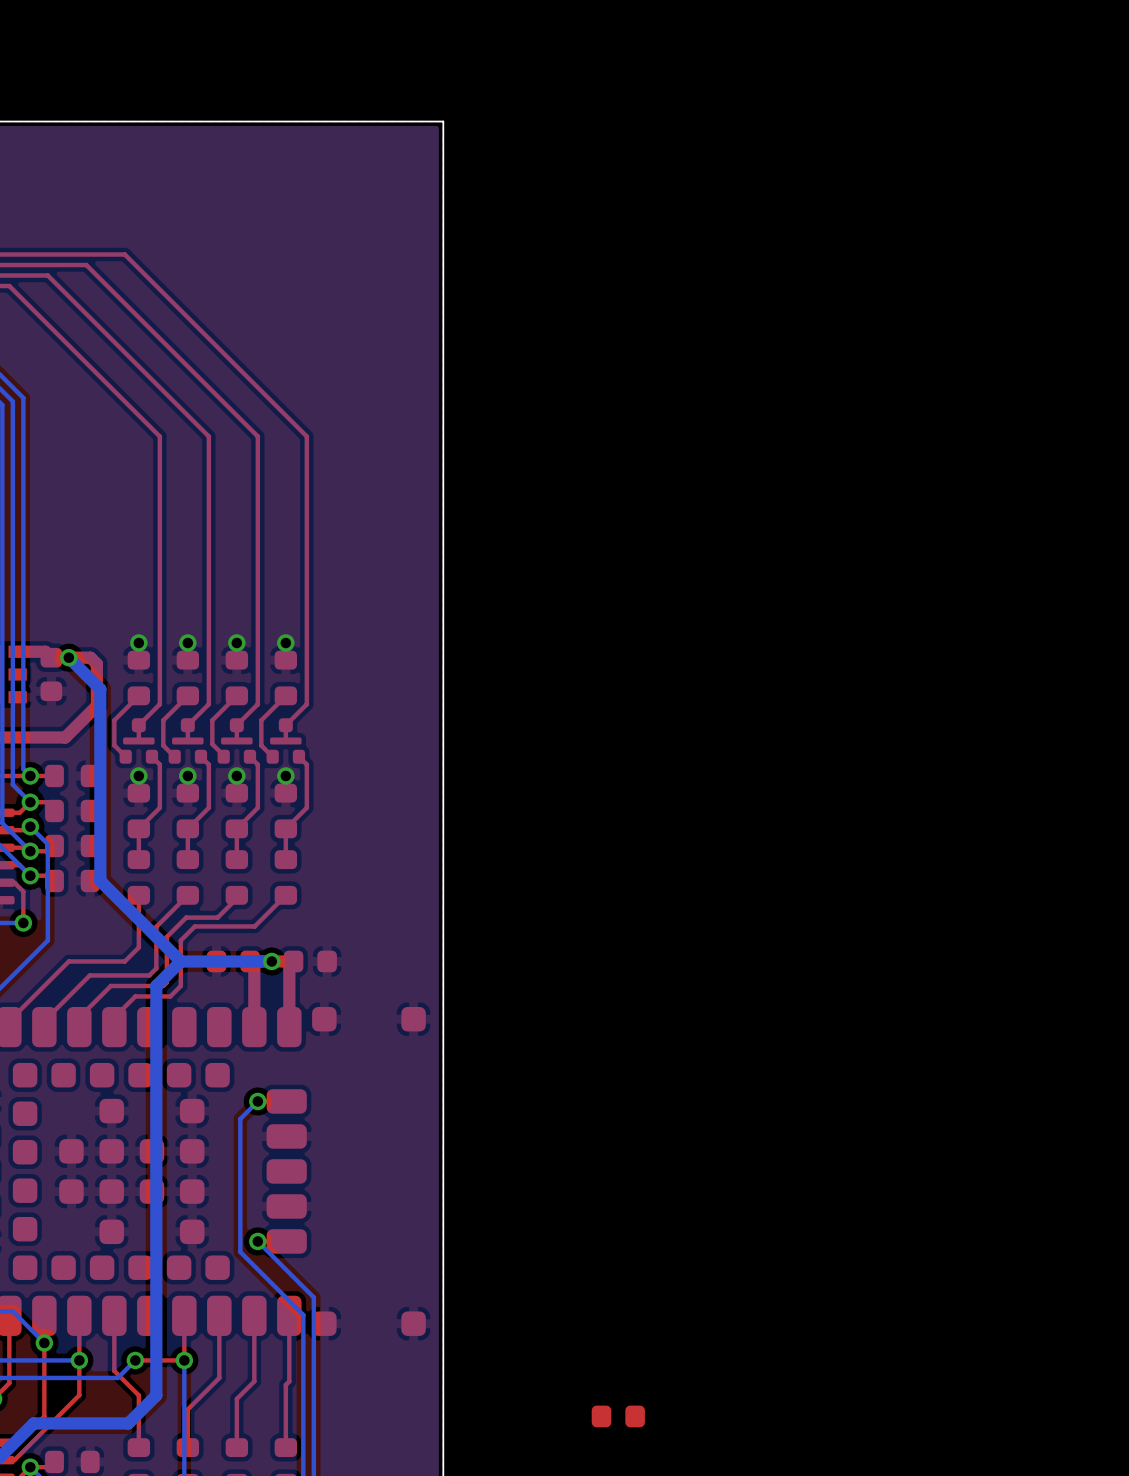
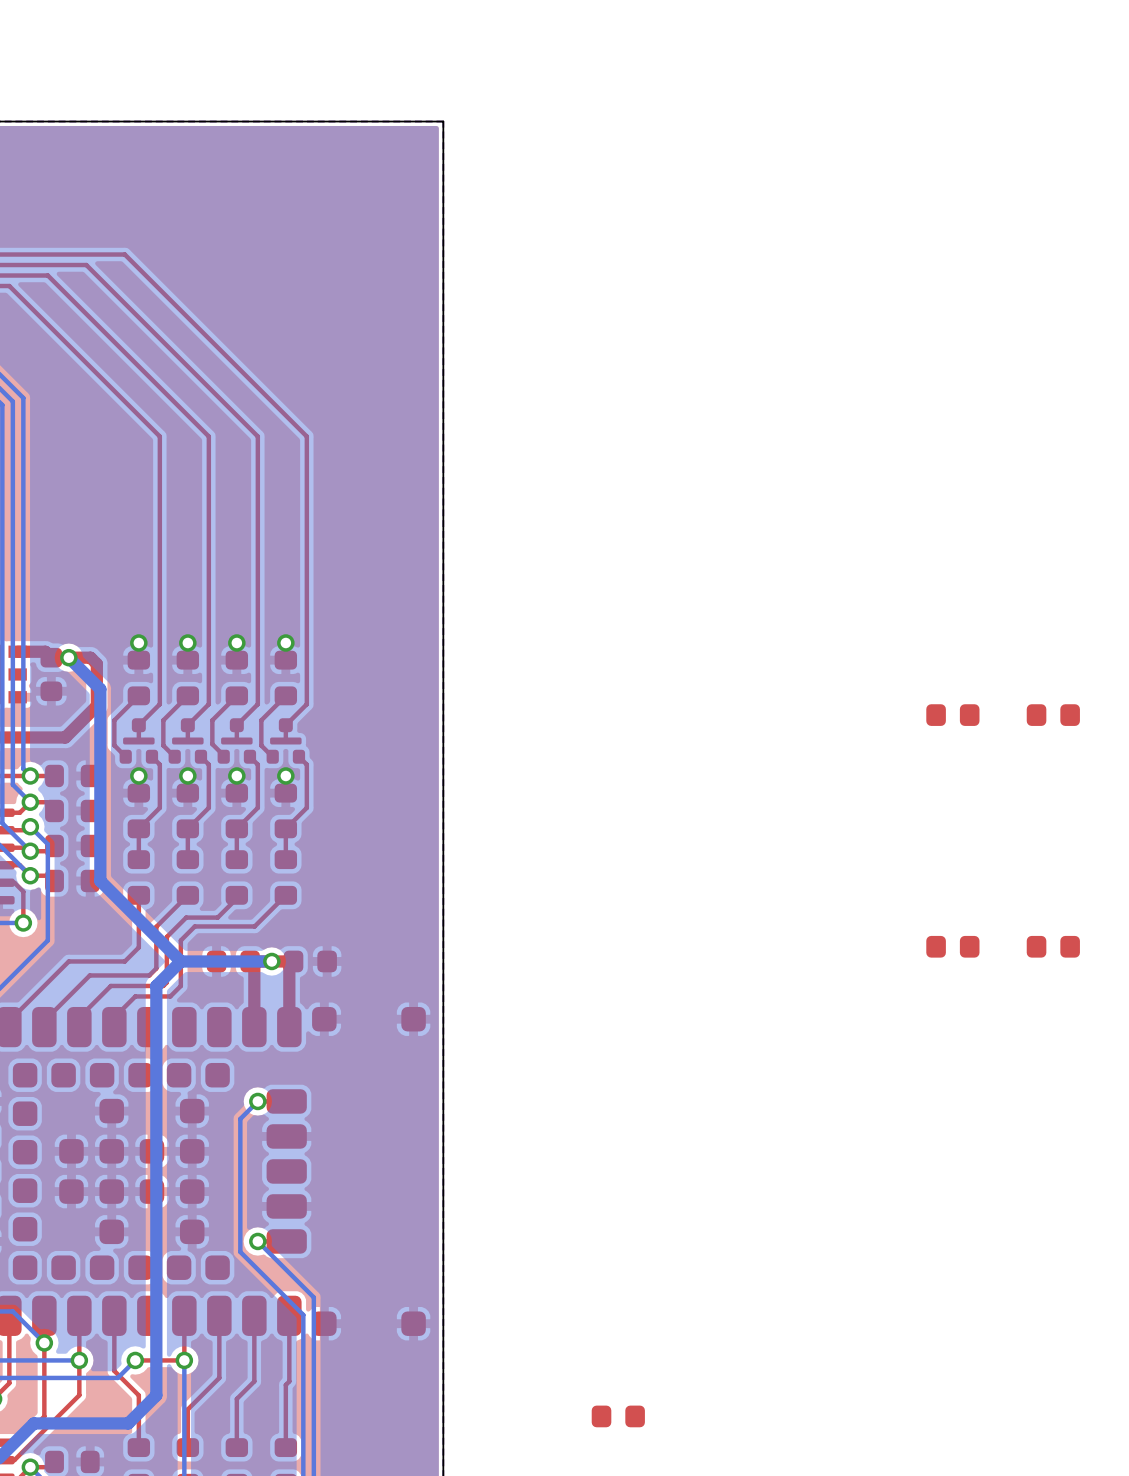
part: none -> (952, 715)
part: none -> (1053, 715)
part: none -> (952, 946)
part: none -> (1053, 946)

